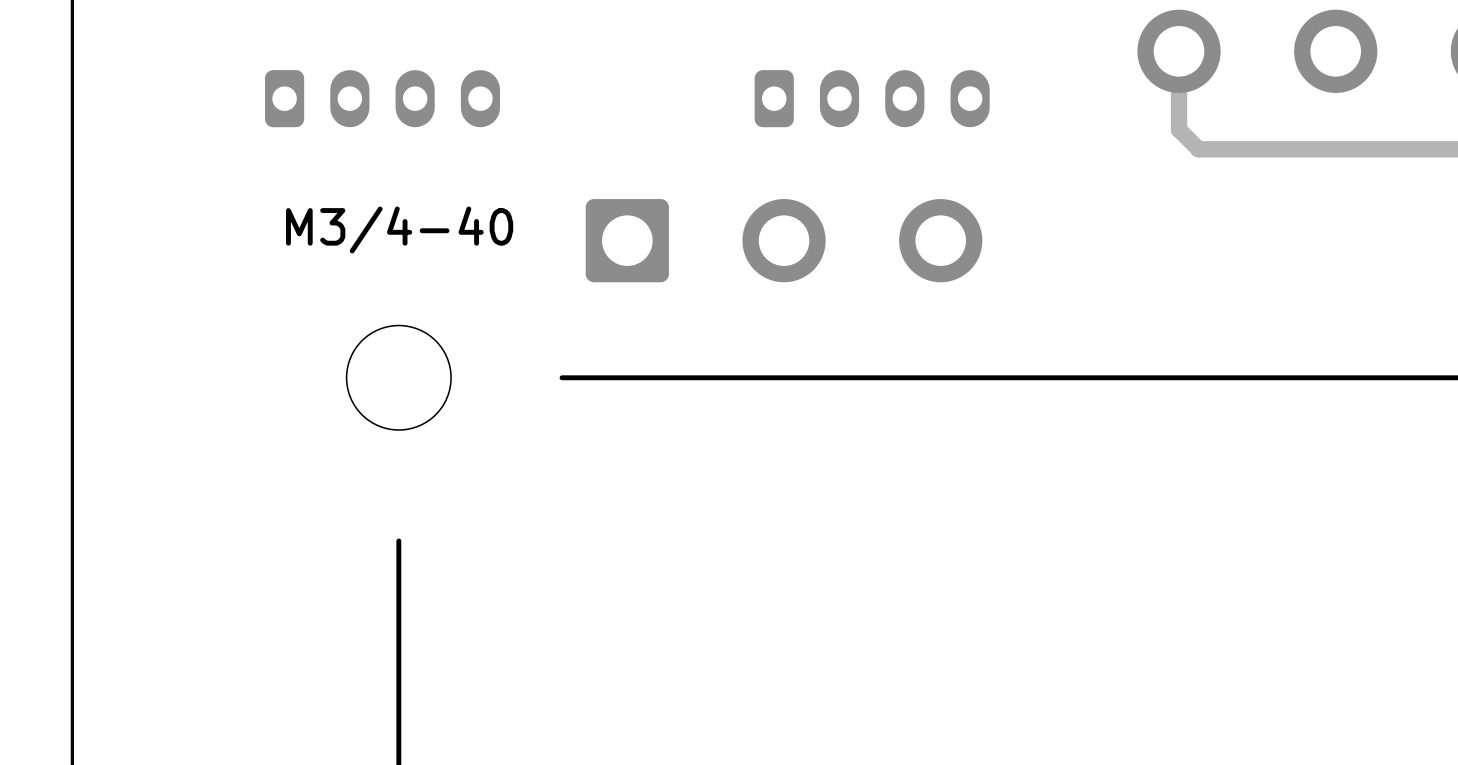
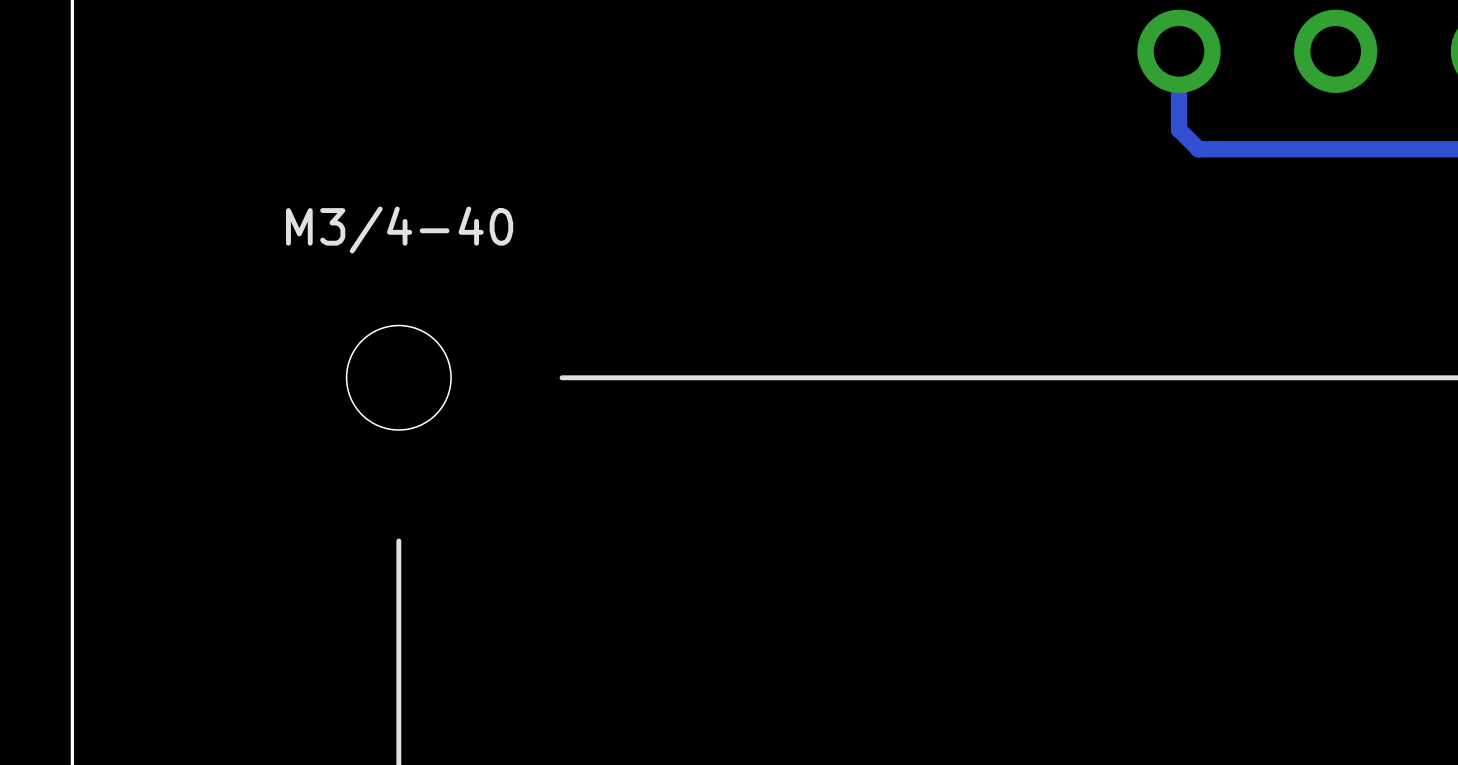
part: (382, 98) -> none
part: (872, 98) -> none
part: (784, 240) -> none

